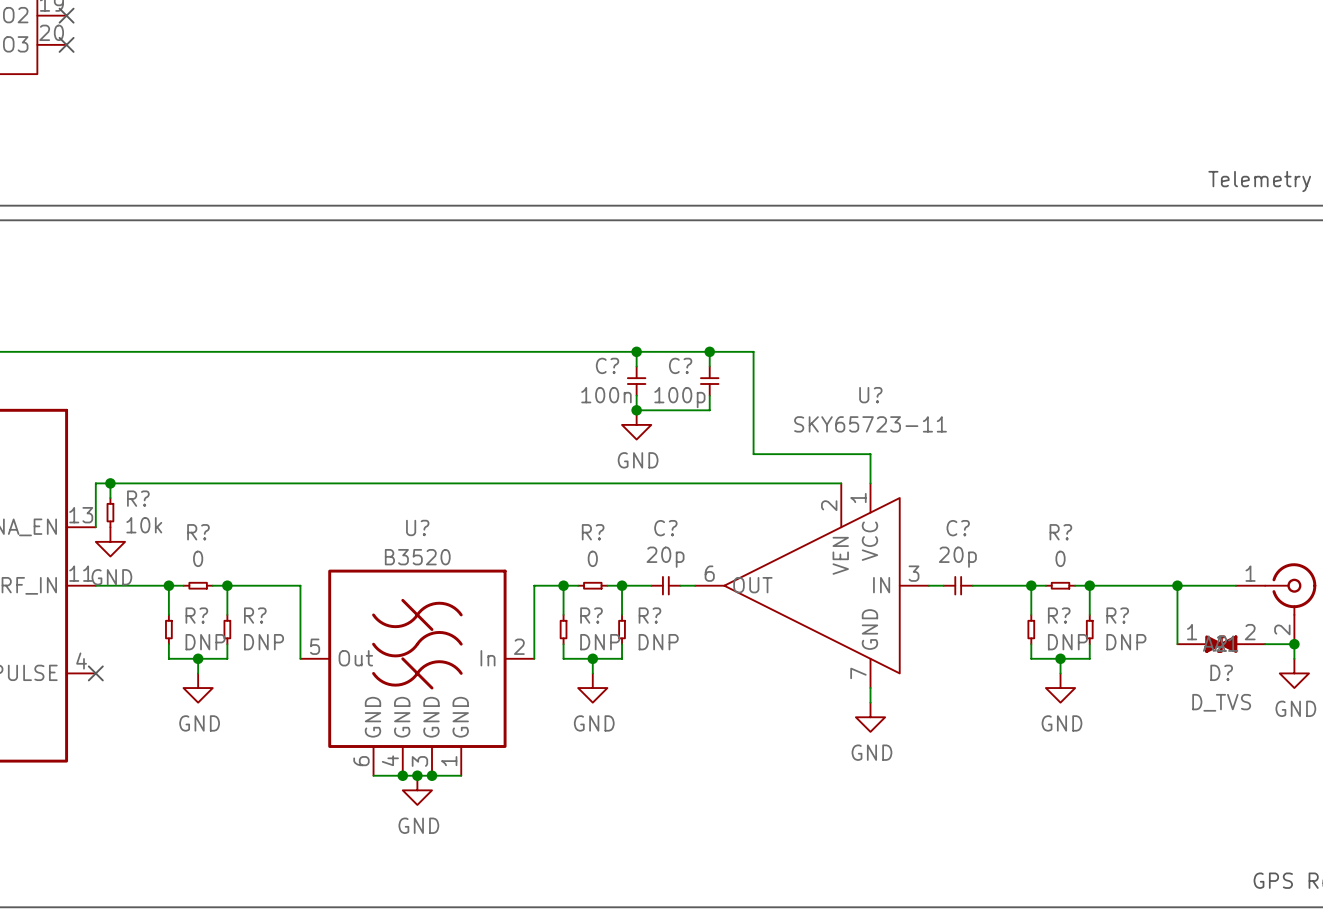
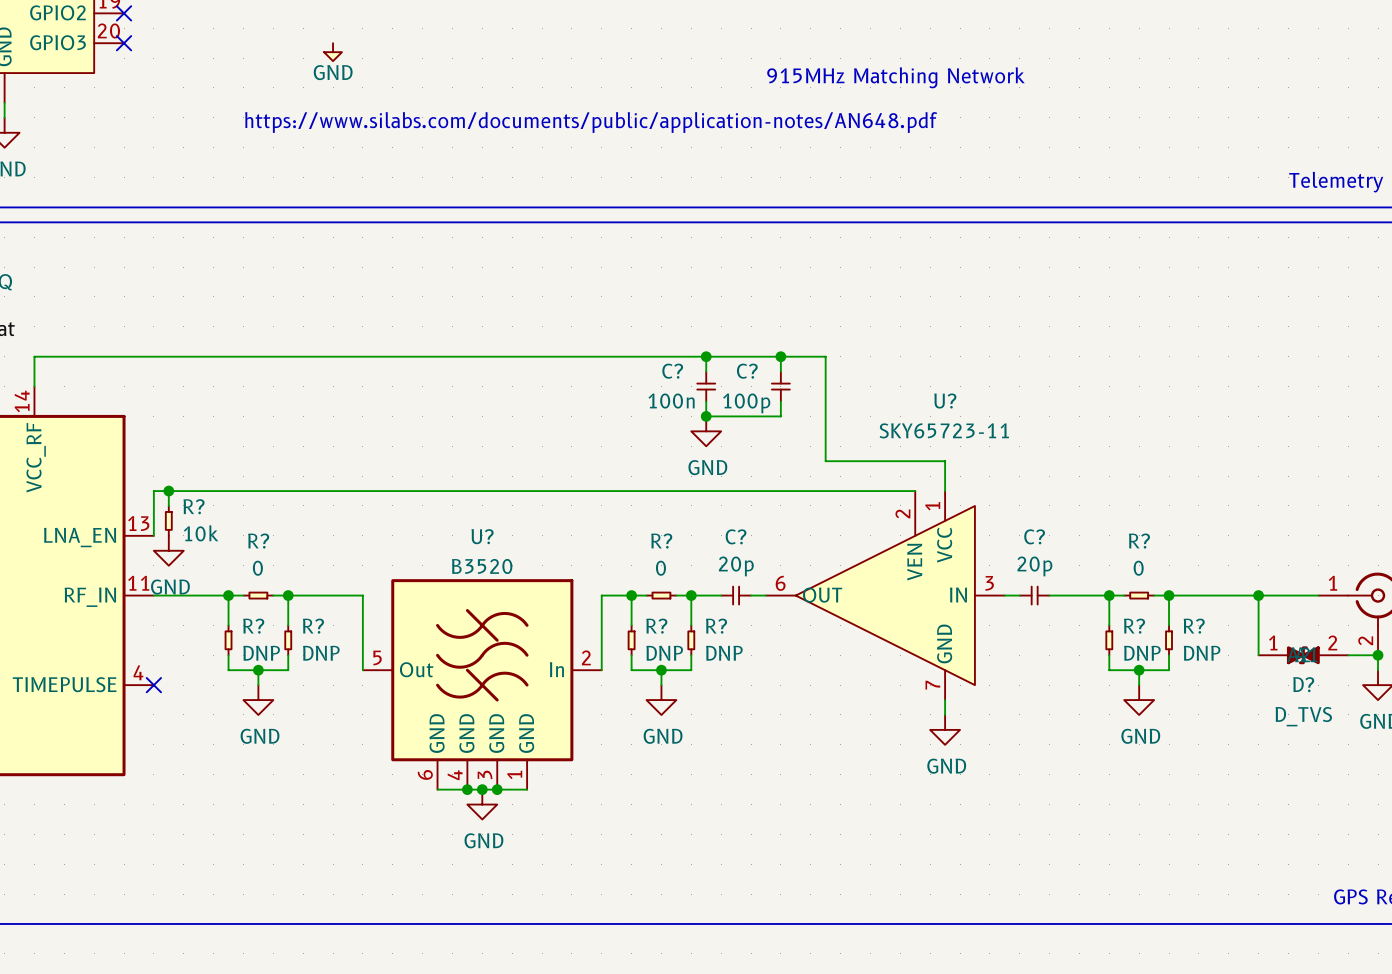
power symbol: none -> GND (333, 52)
text: none -> 915MHz Matching Network (895, 77)
text: none -> https://www.silabs.com/documents/public/application-notes/AN648.pdf (591, 122)

